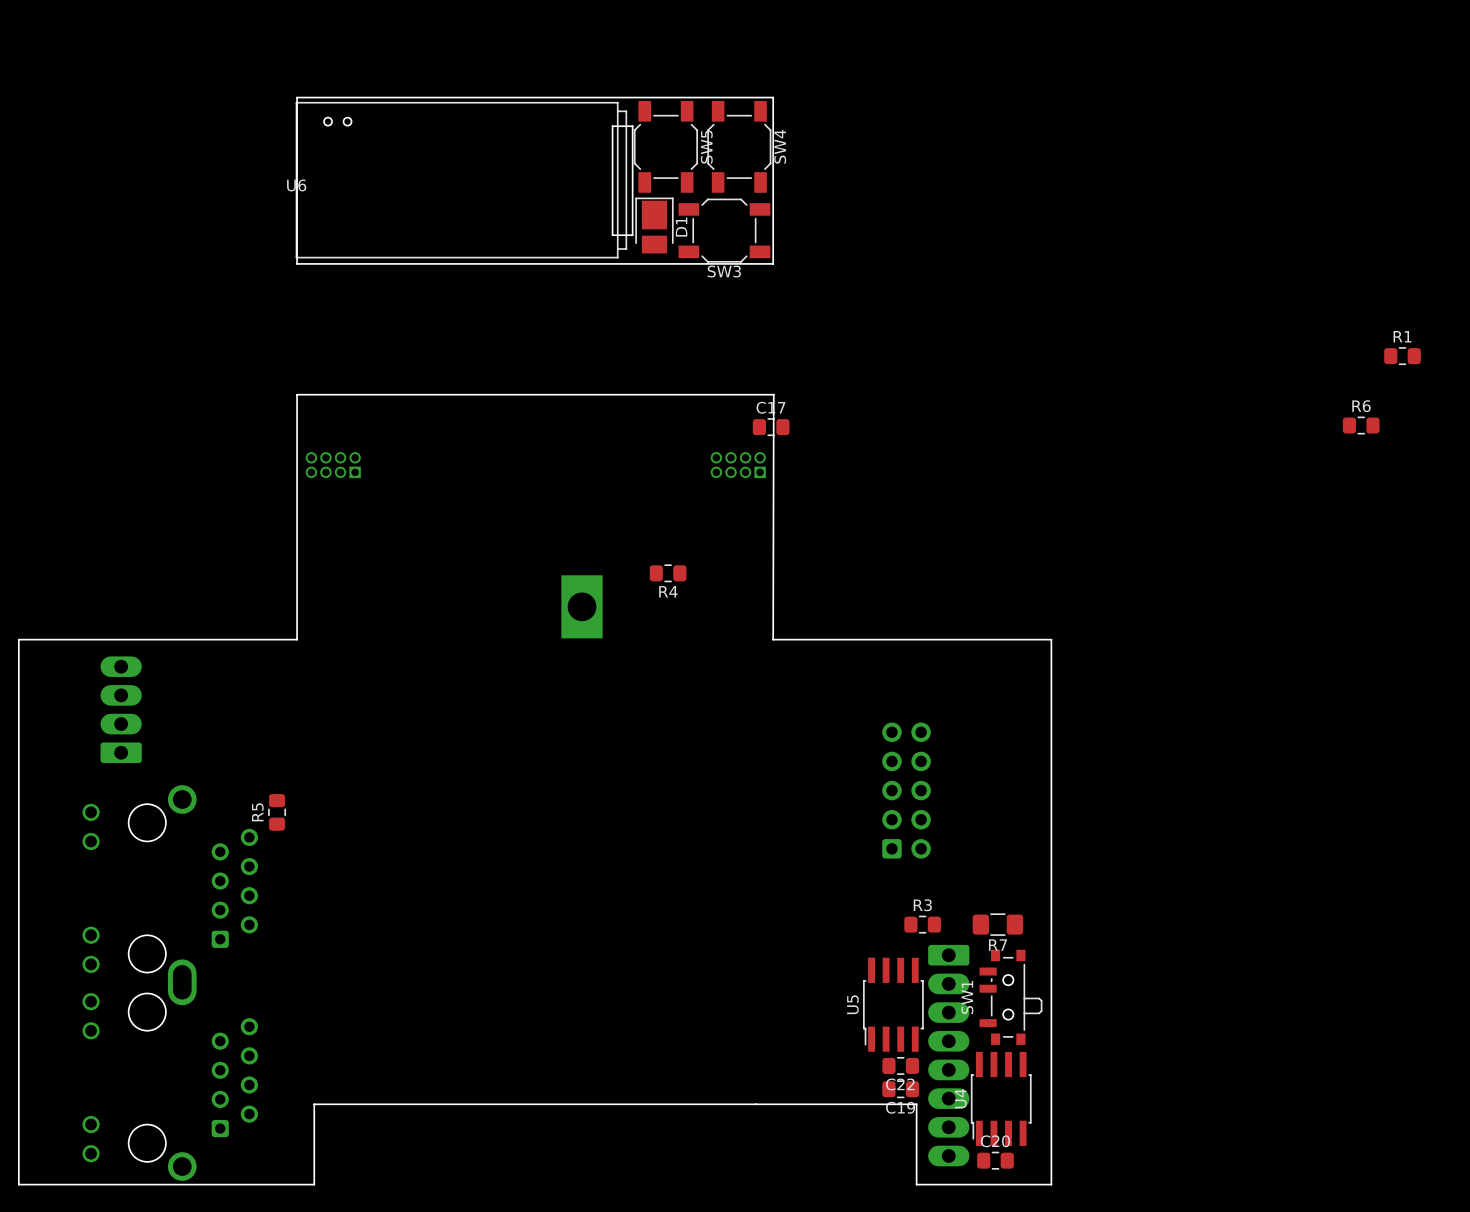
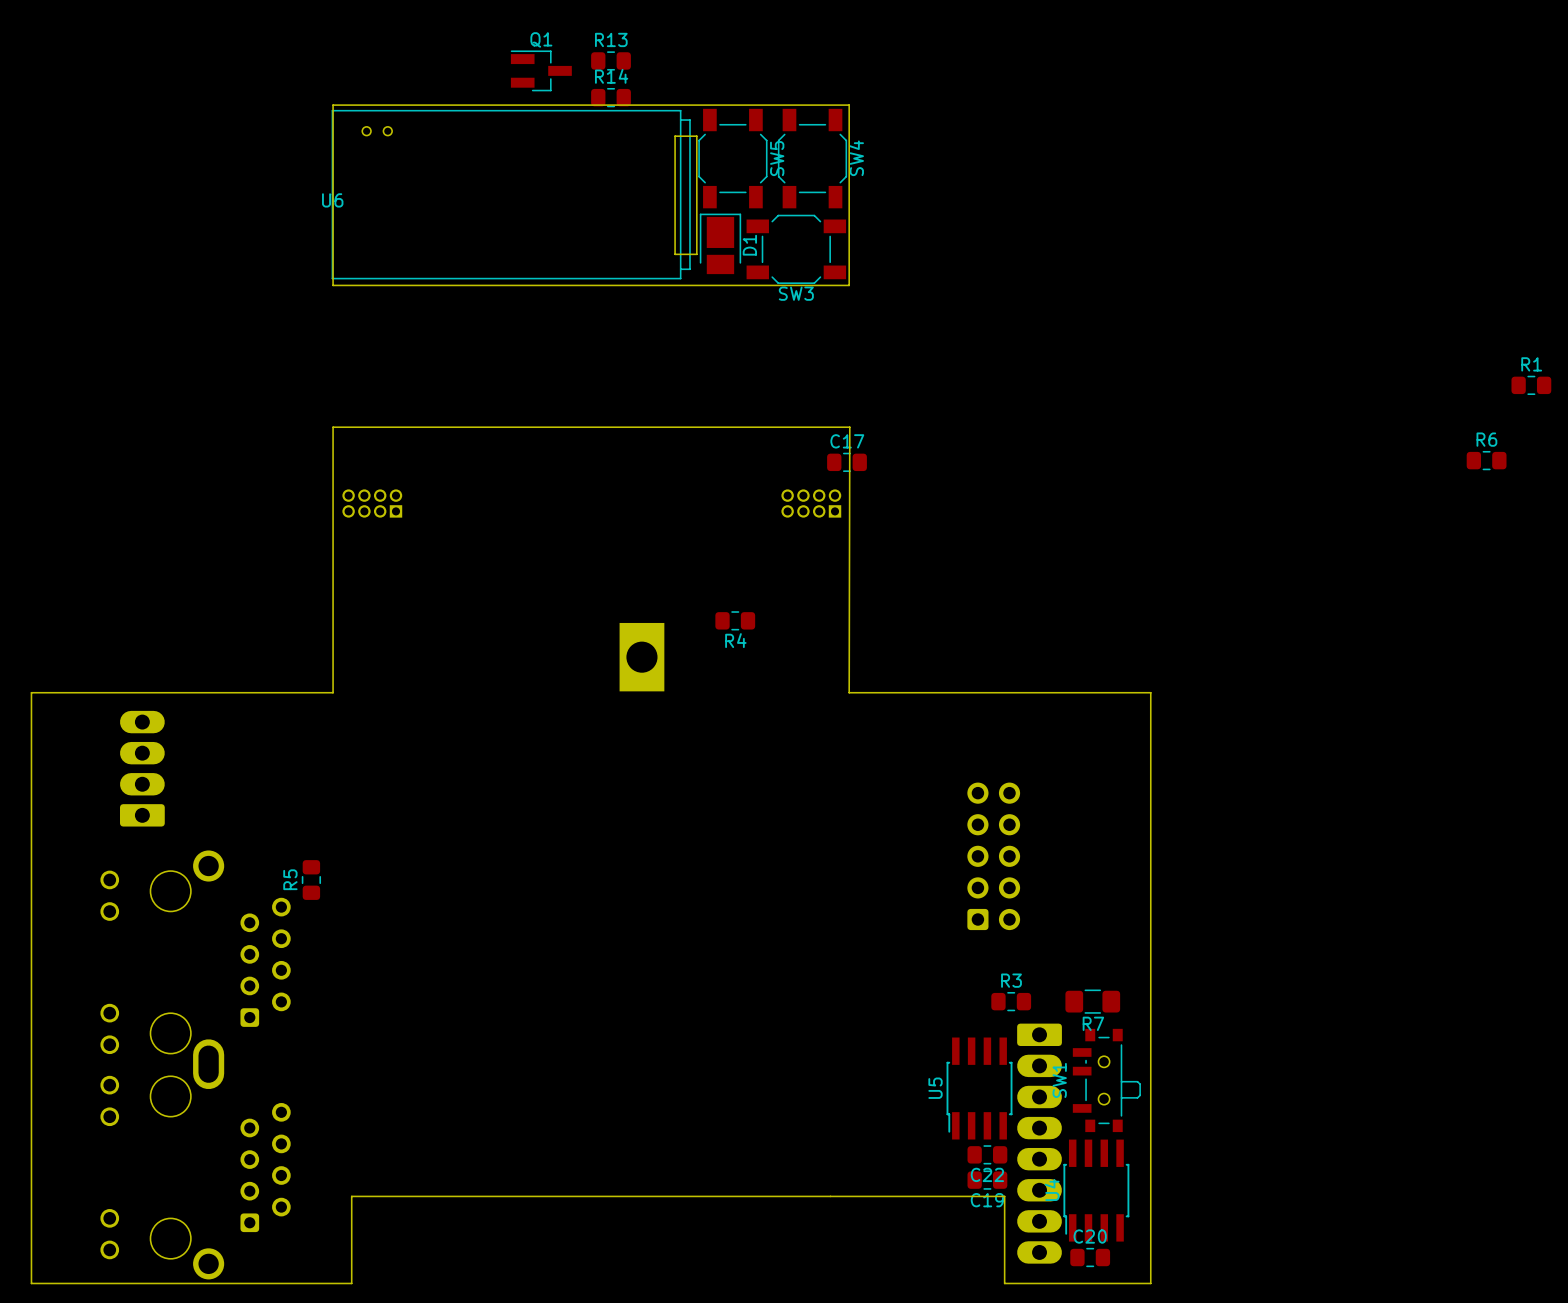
R13: none -> (611, 60)
Q1: none -> (541, 70)
R14: none -> (611, 97)

